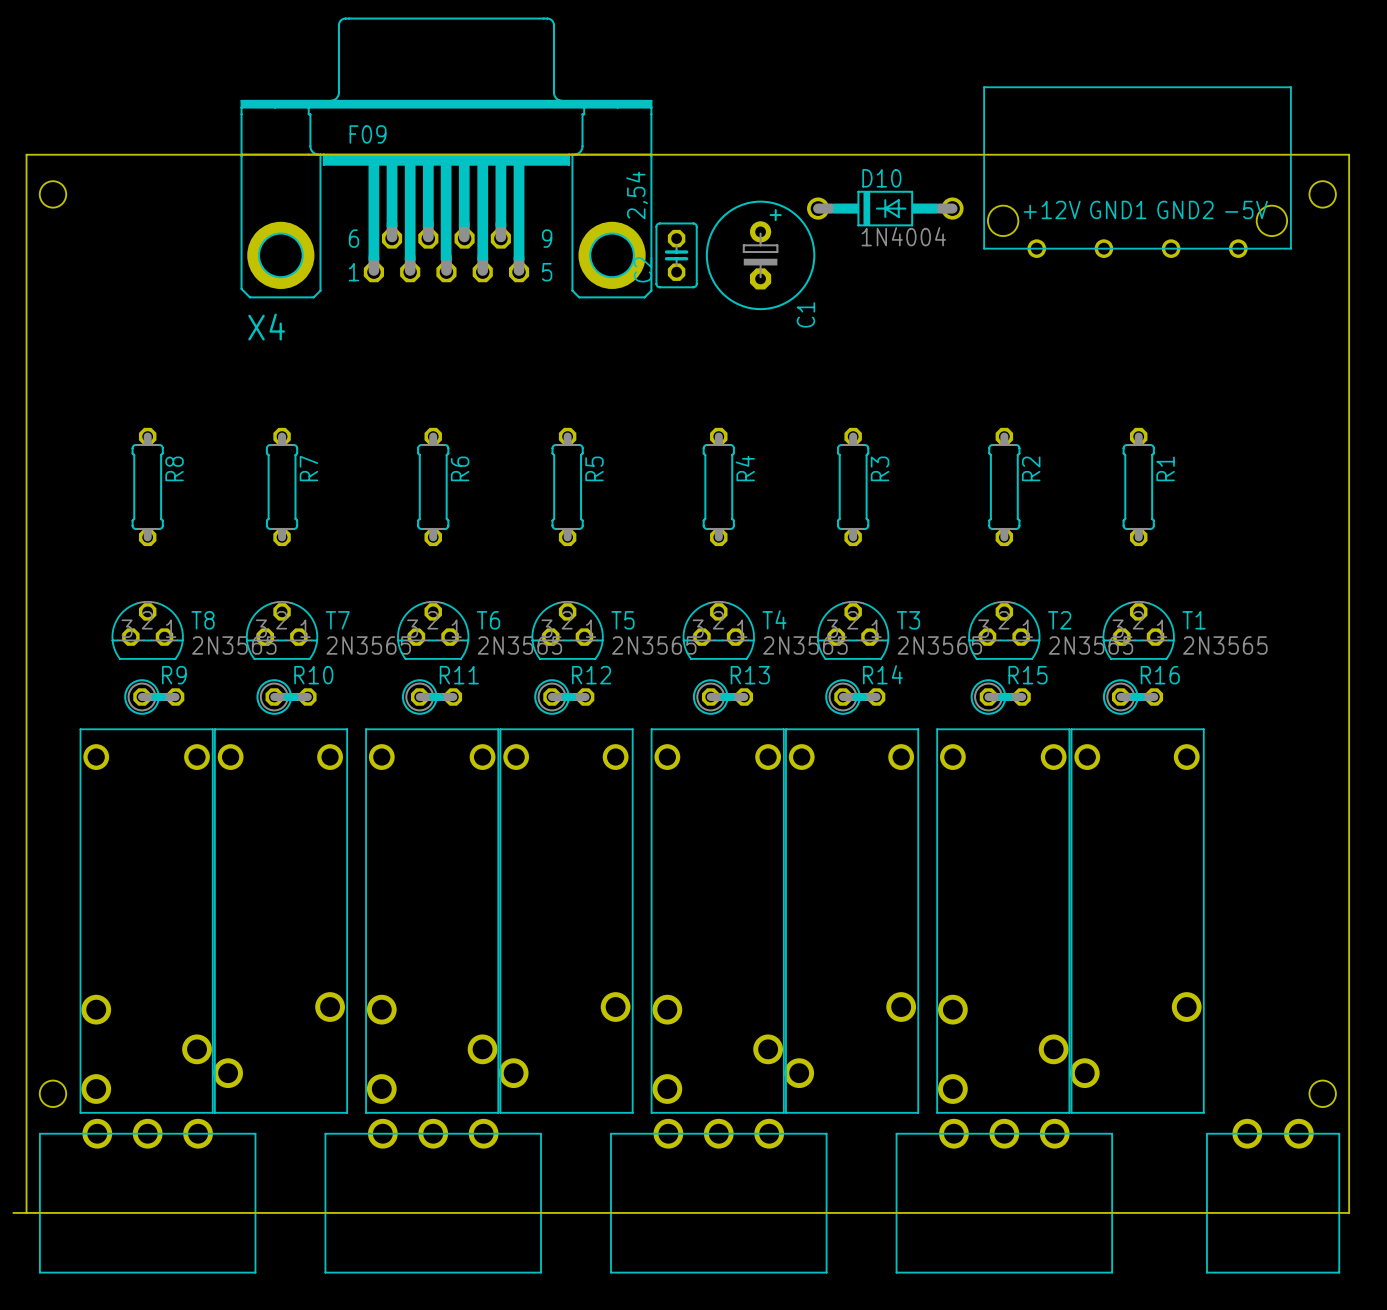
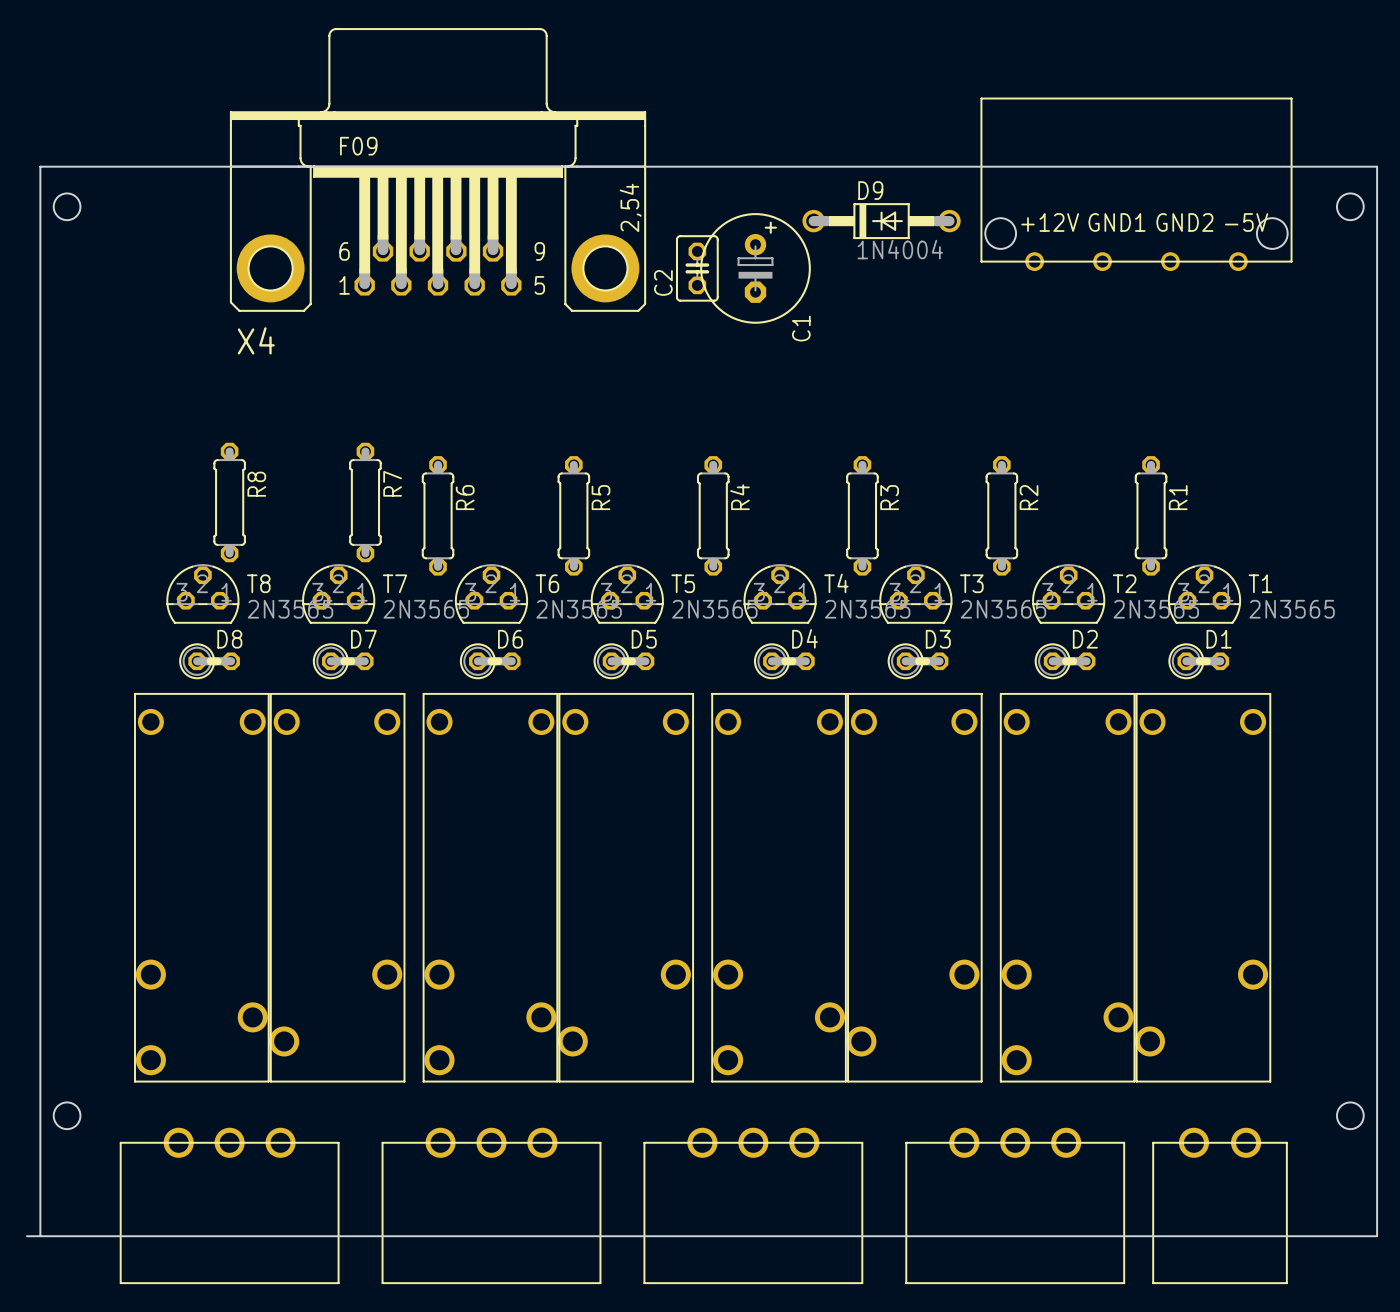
X4 position: (446, 157) -> (438, 169)
part position: (1137, 172) -> (1136, 184)
D9: none -> 1N4004 (881, 221)
D10: 1N4004 (885, 208) -> none
C1 position: (760, 255) -> (755, 268)
R8 position: (147, 486) -> (229, 502)
R7 position: (282, 486) -> (365, 502)
R6 position: (433, 486) -> (438, 515)
R5 position: (567, 486) -> (573, 515)
R4 position: (718, 486) -> (713, 515)
R3 position: (853, 486) -> (862, 515)
R2 position: (1004, 486) -> (1001, 515)
R1 position: (1138, 486) -> (1151, 515)
T8 position: (147, 630) -> (202, 593)
T7 position: (282, 630) -> (338, 593)
T6 position: (433, 630) -> (491, 593)
T5 position: (567, 630) -> (627, 593)
T4 position: (718, 630) -> (780, 593)
T3 position: (853, 630) -> (915, 593)
T2 position: (1004, 630) -> (1068, 593)
T1 position: (1138, 630) -> (1204, 593)
D8: none -> (209, 661)
D7: none -> (343, 661)
D6: none -> (490, 661)
D5: none -> (623, 661)
D4: none -> (784, 661)
D3: none -> (918, 661)
D2: none -> (1065, 661)
D1: none -> (1198, 661)
R9: (154, 697) -> none
R10: (286, 697) -> none
R11: (432, 697) -> none
R12: (564, 697) -> none
R13: (722, 697) -> none
R14: (855, 697) -> none
R15: (1000, 697) -> none
R16: (1132, 697) -> none
part: none -> (201, 887)
part: none -> (490, 887)
part: none -> (779, 887)
part: none -> (1067, 887)
part: (146, 921) -> none
part position: (280, 921) -> (337, 887)
part: (432, 921) -> none
part position: (566, 921) -> (625, 887)
part: (717, 921) -> none
part position: (851, 921) -> (914, 887)
part: (1003, 921) -> none
part position: (1137, 921) -> (1203, 887)
part position: (147, 1196) -> (229, 1205)
part position: (433, 1196) -> (491, 1205)
part position: (718, 1196) -> (753, 1205)
part position: (1004, 1196) -> (1015, 1205)
part position: (1273, 1196) -> (1220, 1205)

